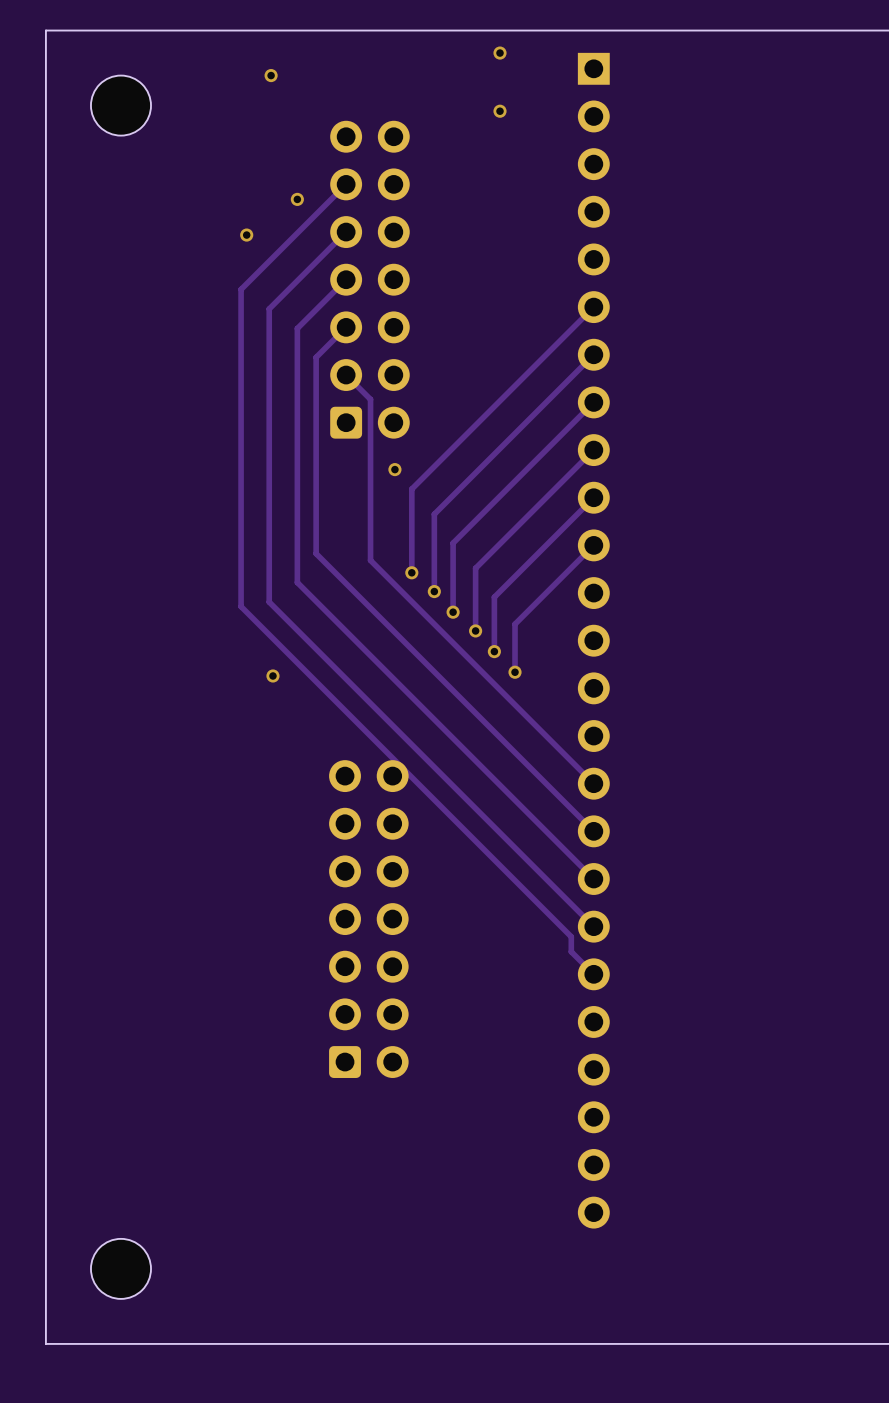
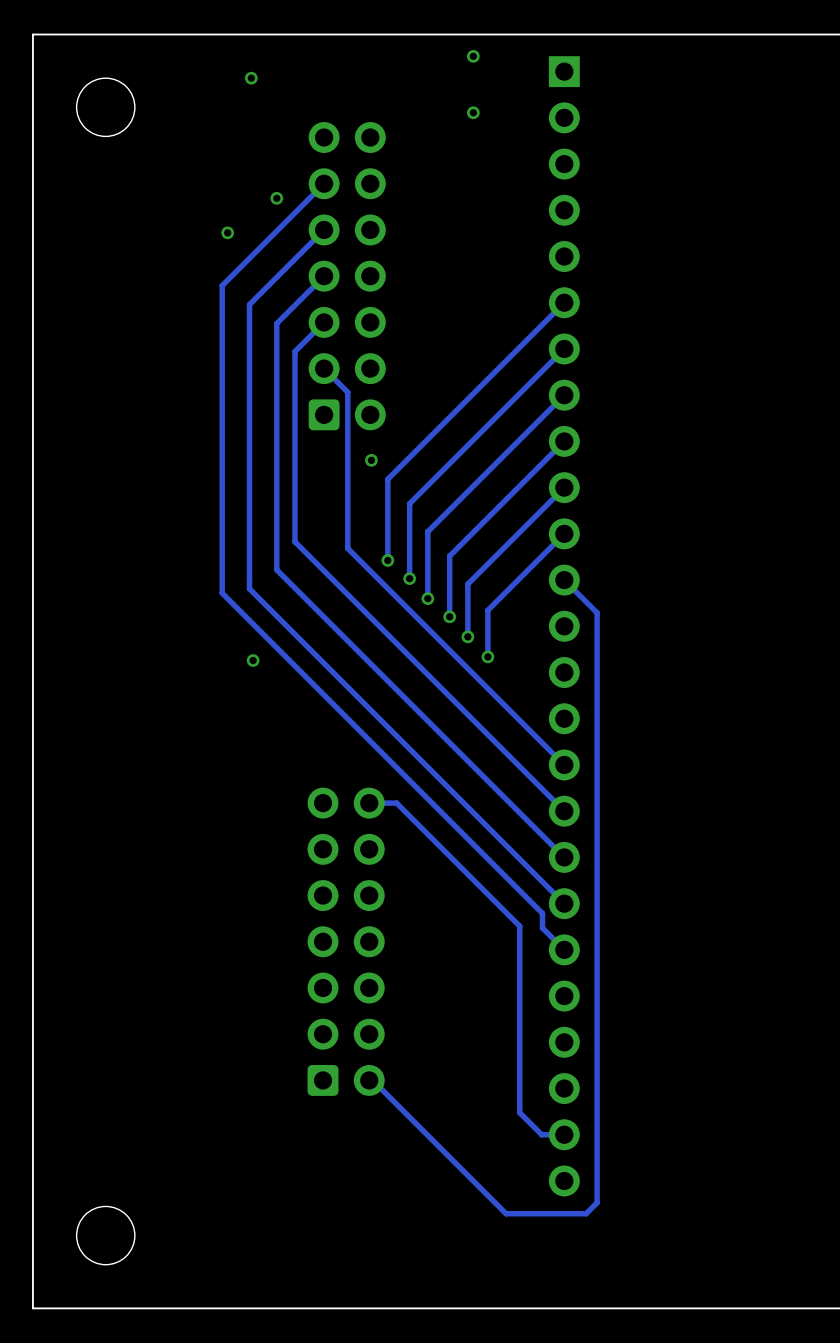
track: none -> (564, 580) (597, 612) (597, 1202) (586, 1213) (506, 1213) (372, 1080) (369, 1080)
track: none -> (369, 803) (396, 803) (519, 926) (519, 1112) (541, 1134) (564, 1134)
part position: (368, 919) -> (346, 941)

